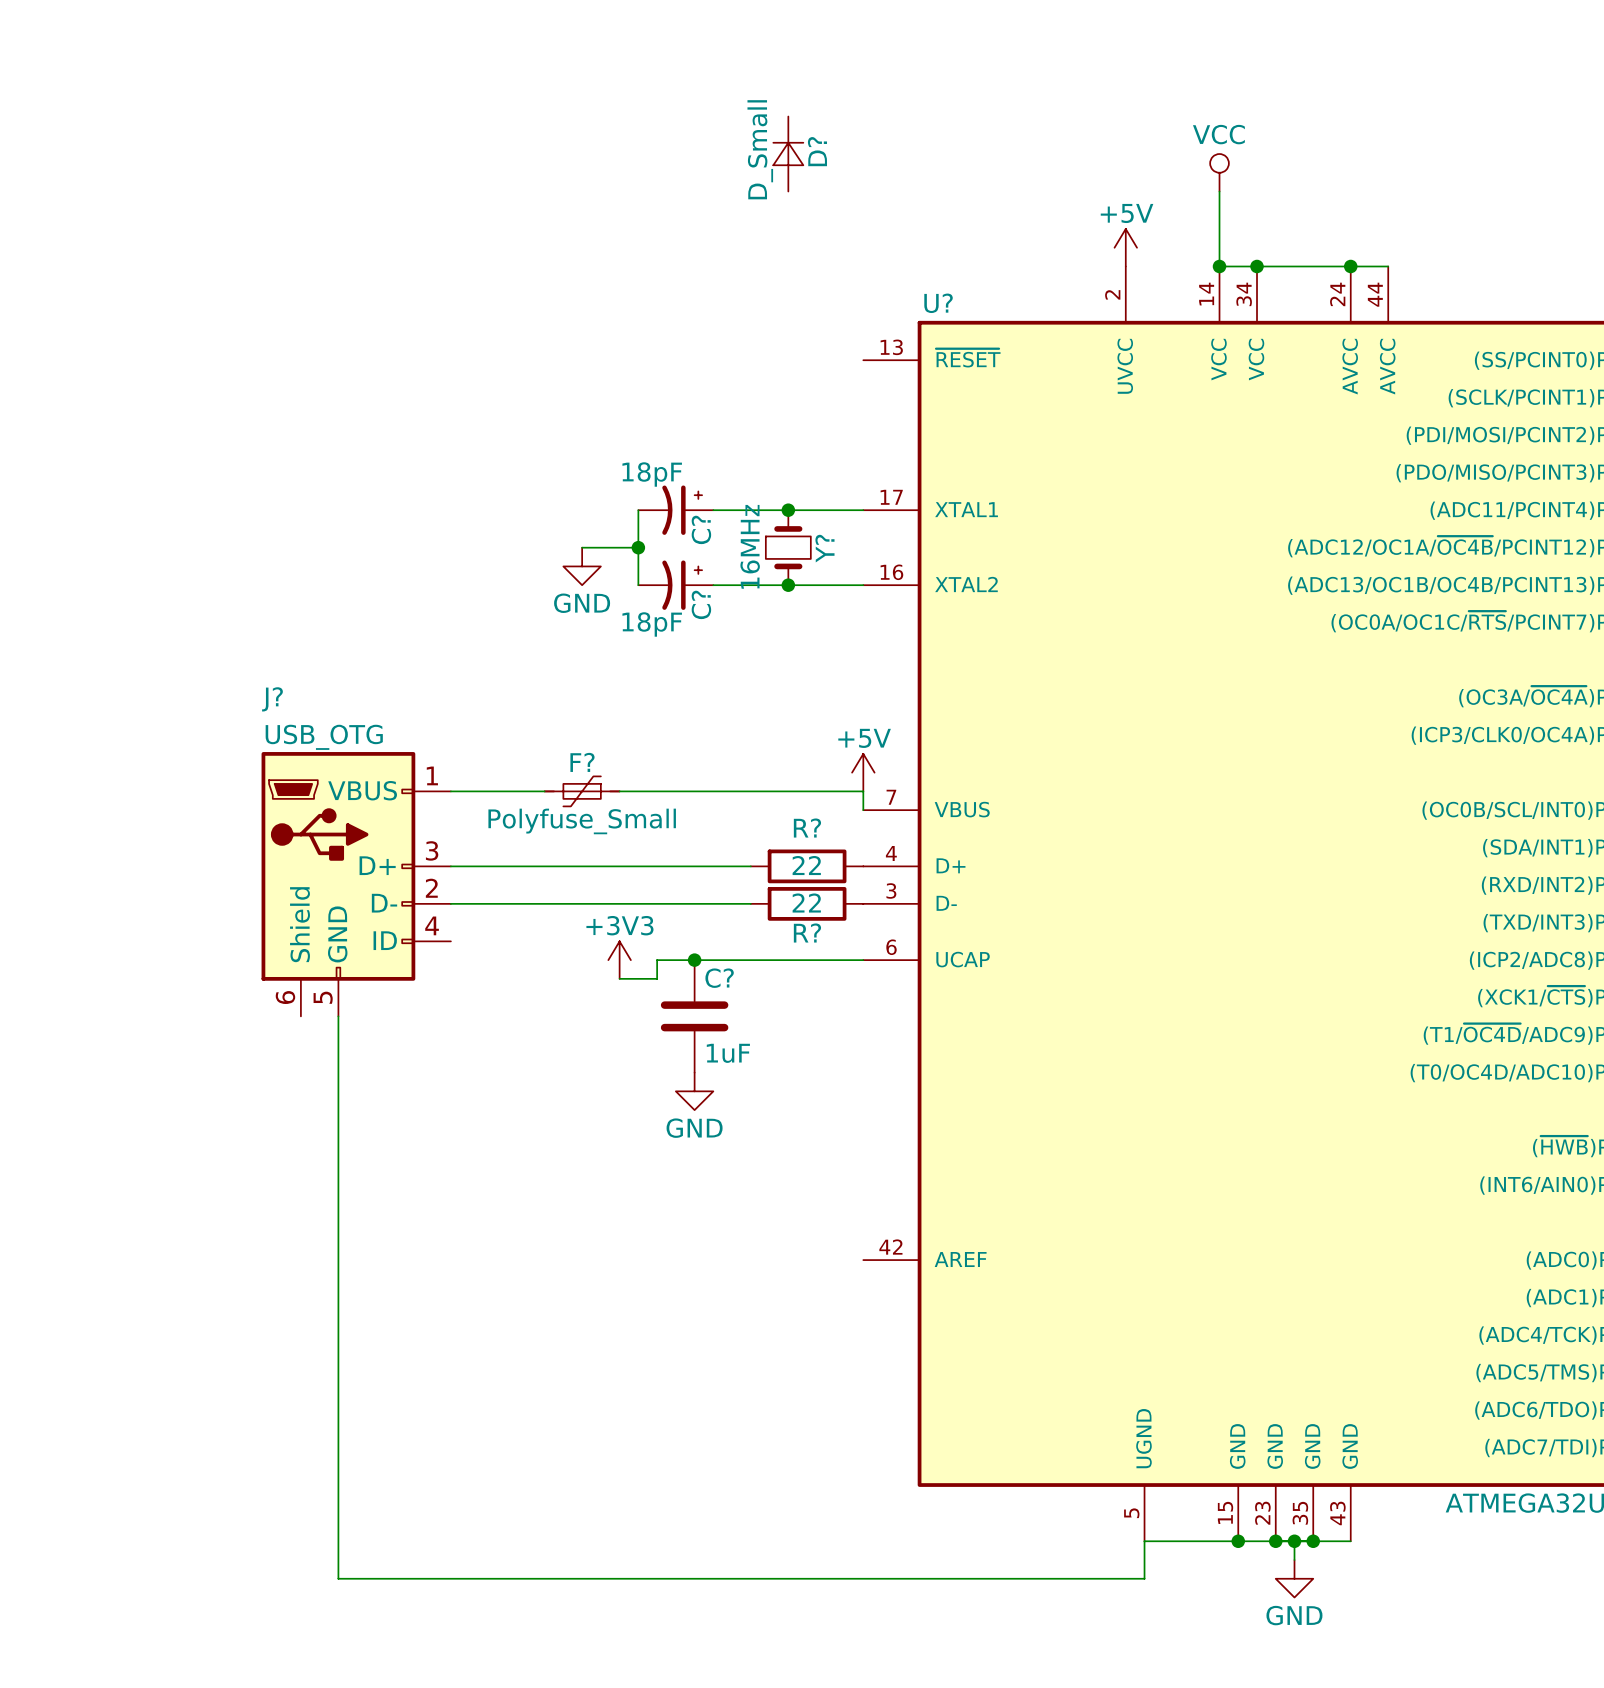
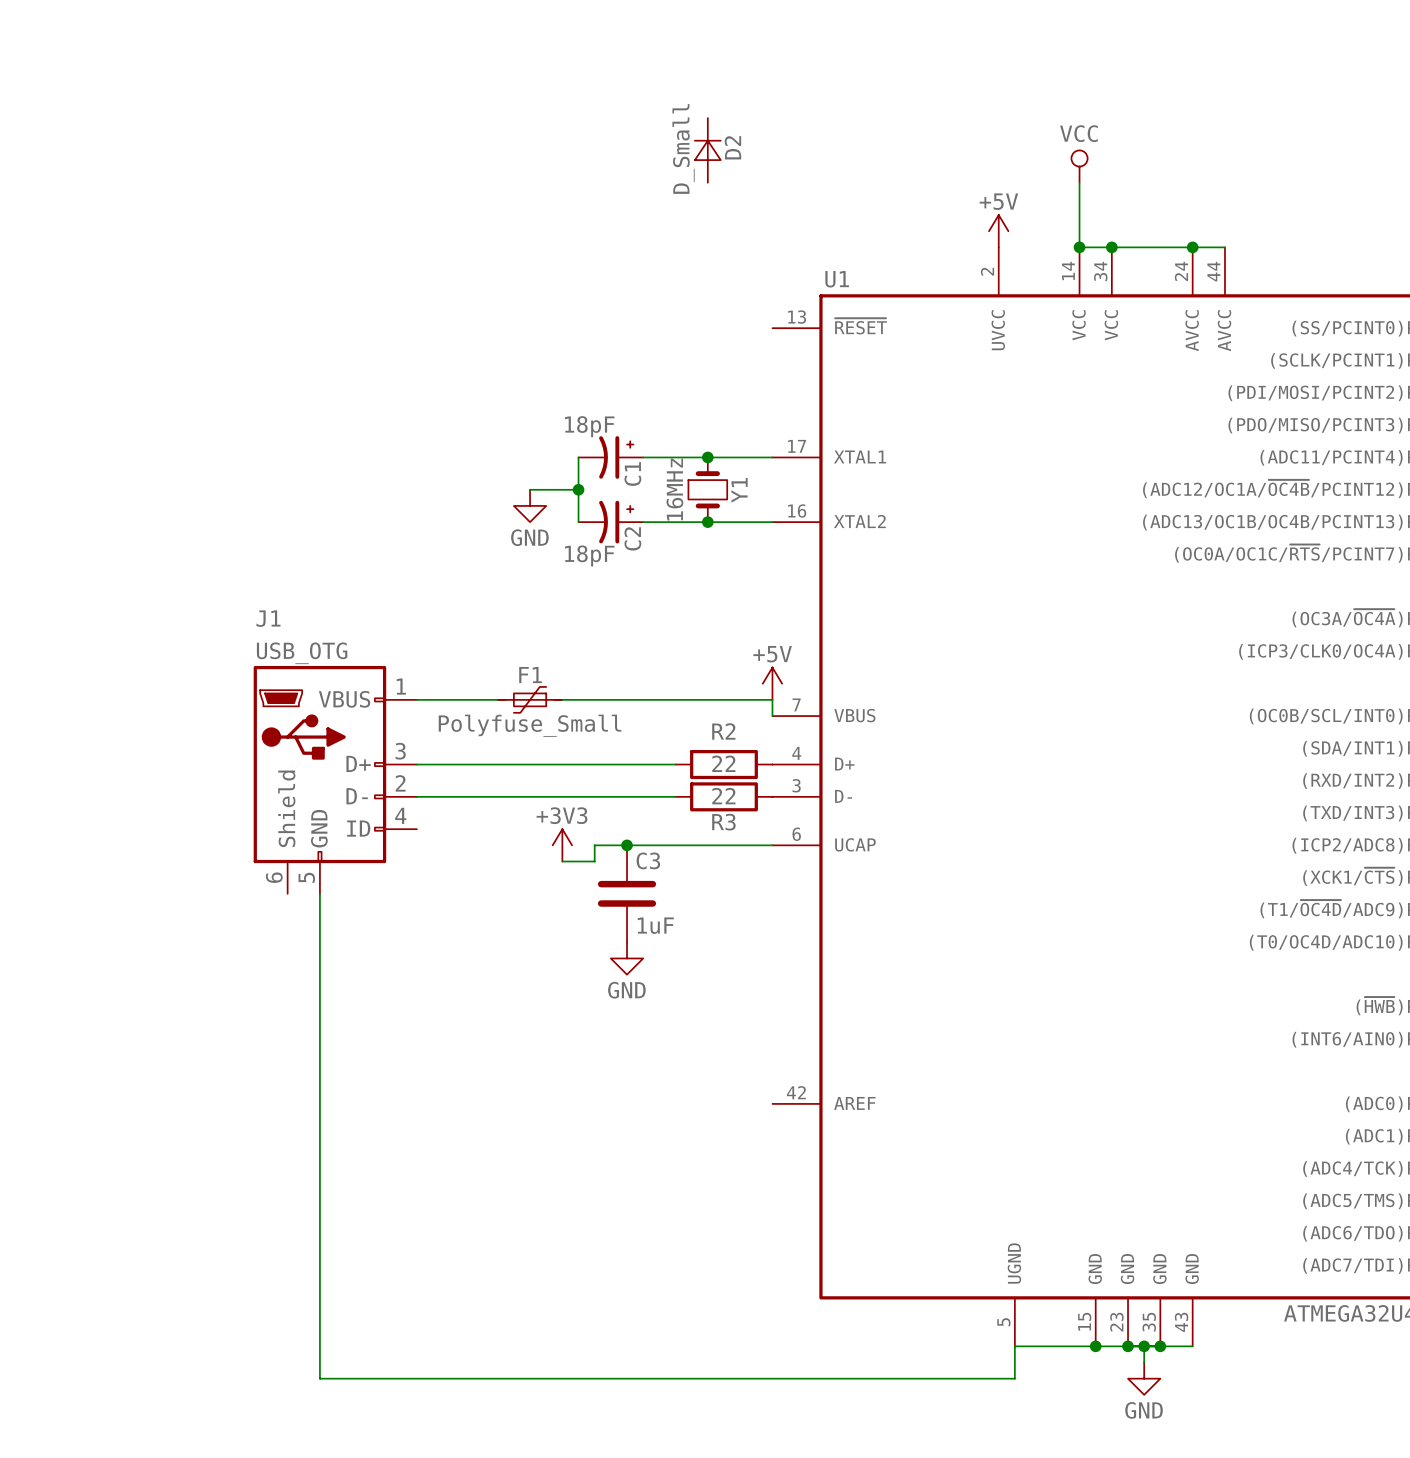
D? name: D? (817, 151) -> D2 (732, 147)
U? name: U? (938, 303) -> U1 (837, 279)
C? name: C? (701, 529) -> C1 (632, 474)
Y? name: Y? (824, 548) -> Y1 (739, 490)
C? name: C? (701, 604) -> C2 (632, 538)
J? name: J? (272, 699) -> J1 (268, 618)
F? name: F? (582, 762) -> F1 (530, 675)
R? name: R? (807, 828) -> R2 (723, 731)
R? name: R? (807, 933) -> R3 (723, 822)
C? name: C? (719, 978) -> C3 (648, 860)

